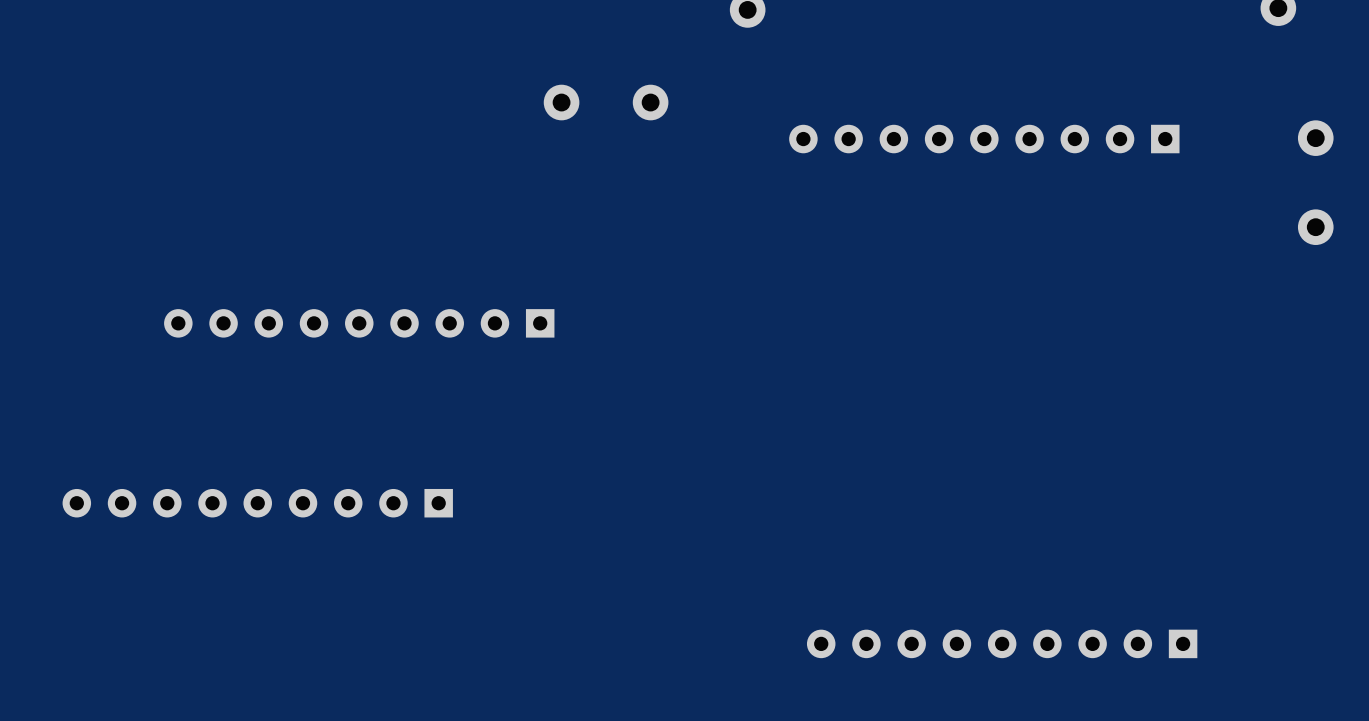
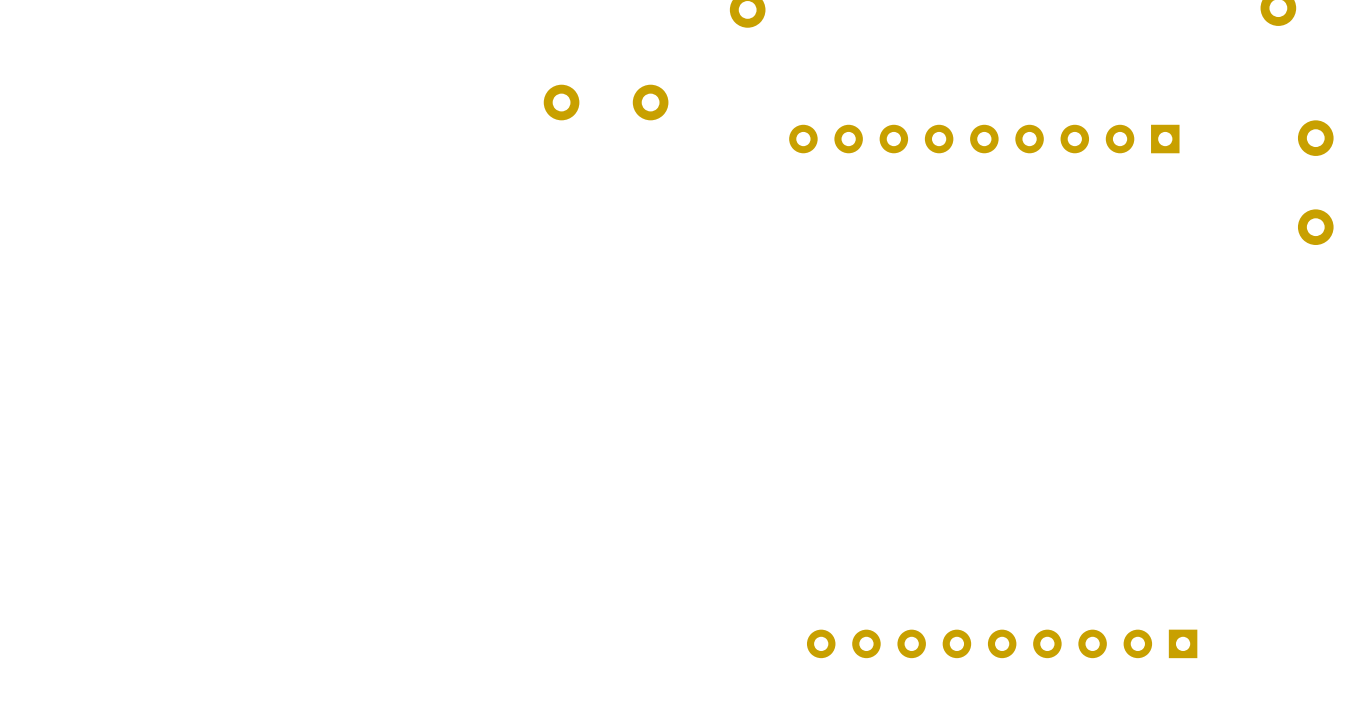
part: (359, 323) -> none
part: (257, 503) -> none

